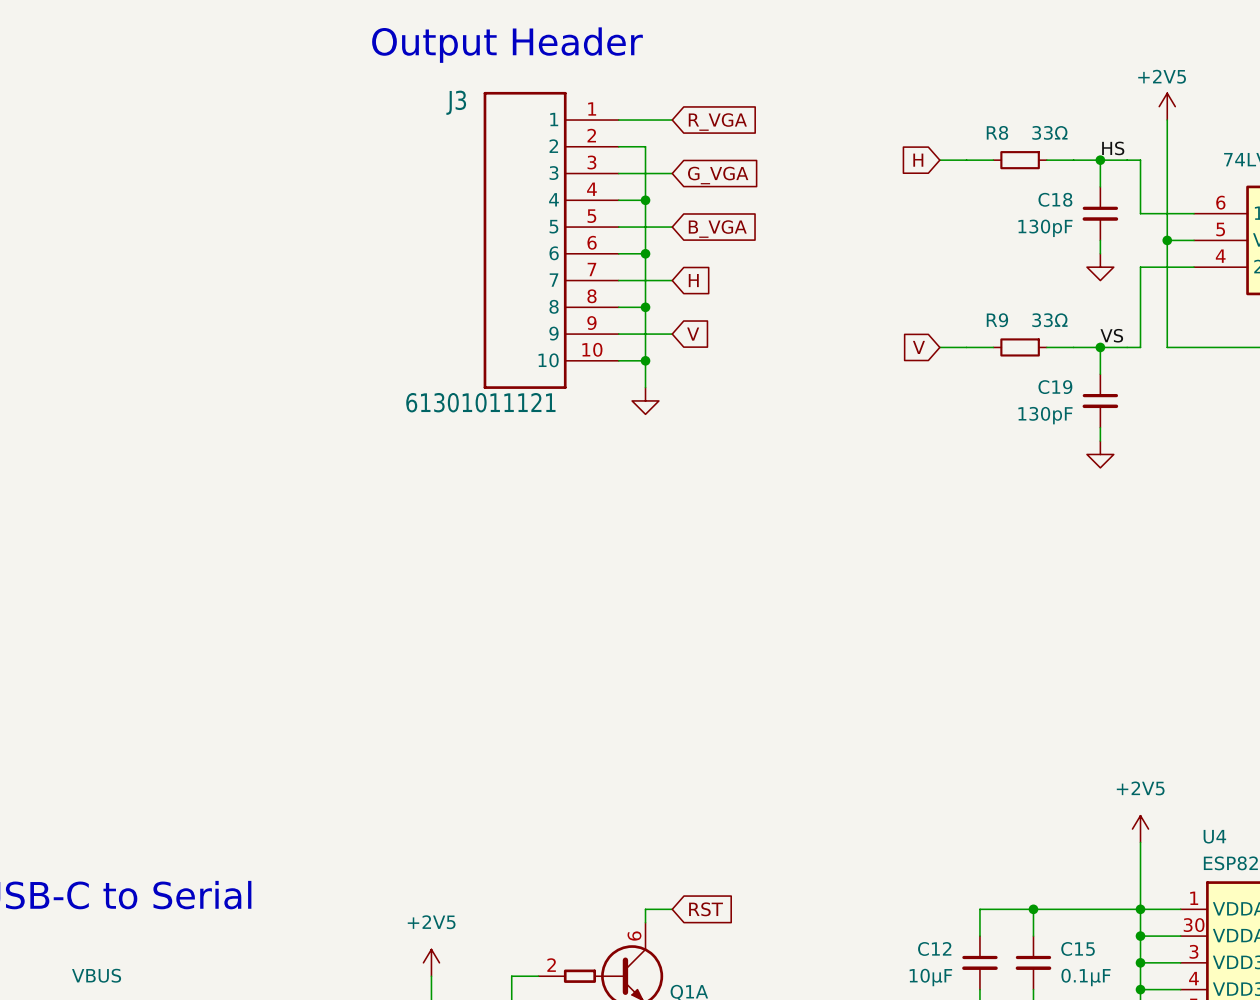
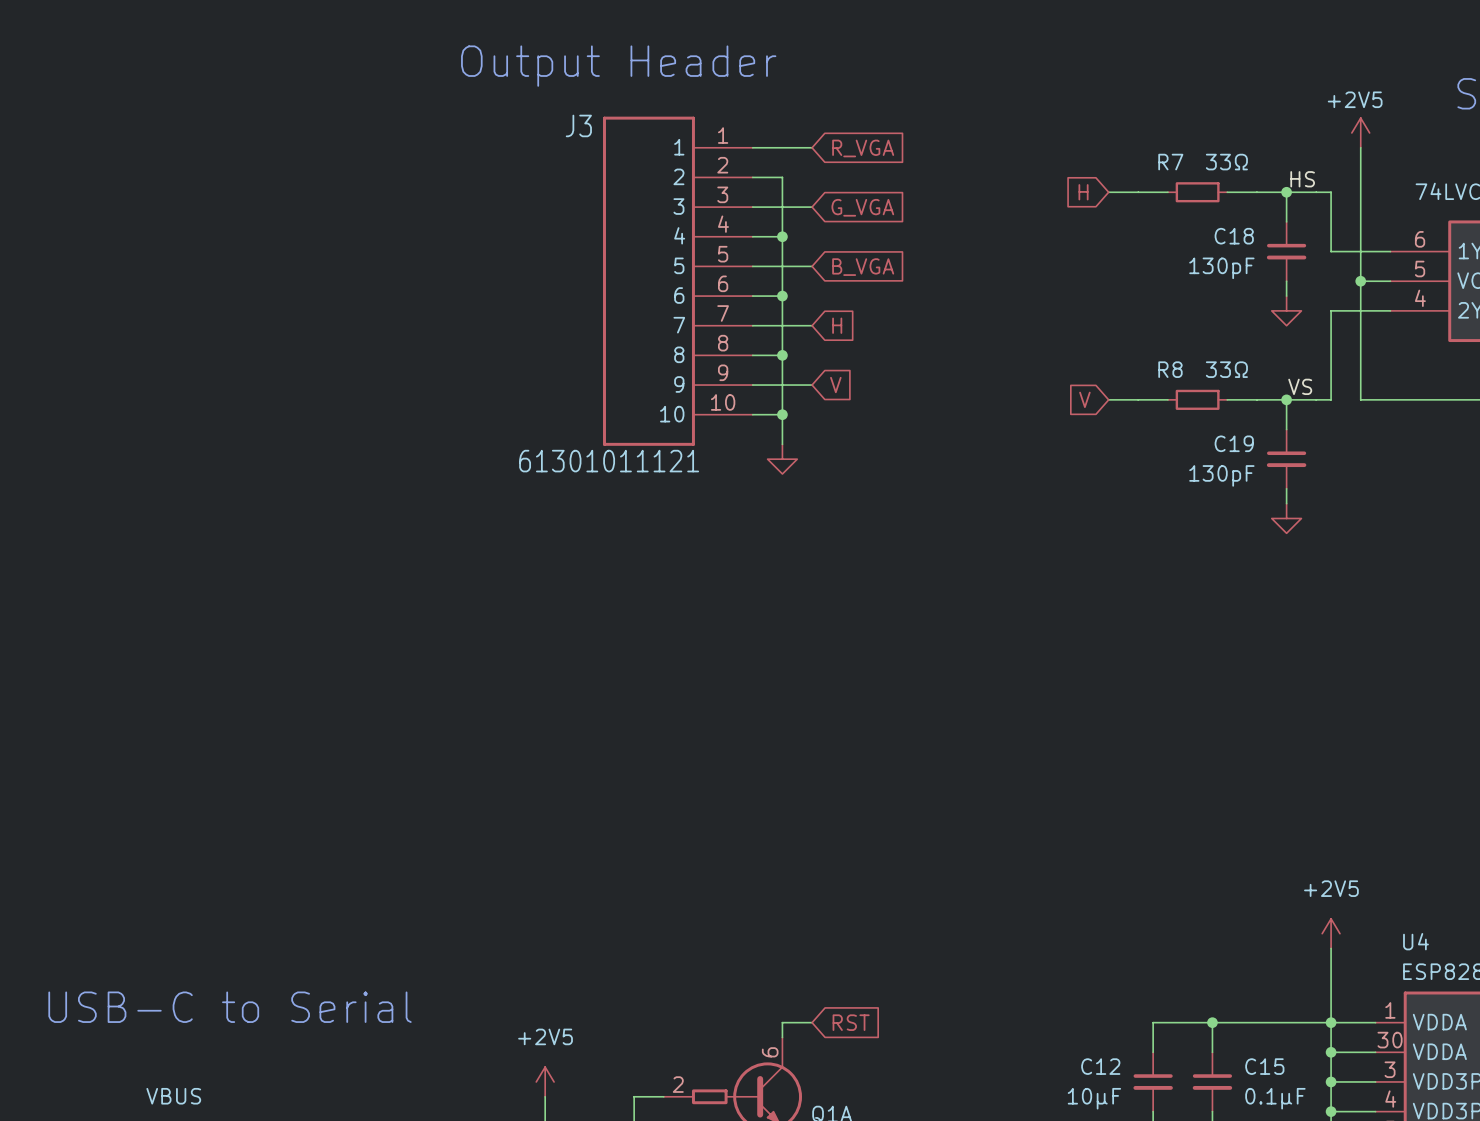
R8 name: R8 (997, 132) -> R7 (1170, 162)
R9 name: R9 (997, 320) -> R8 (1170, 369)

